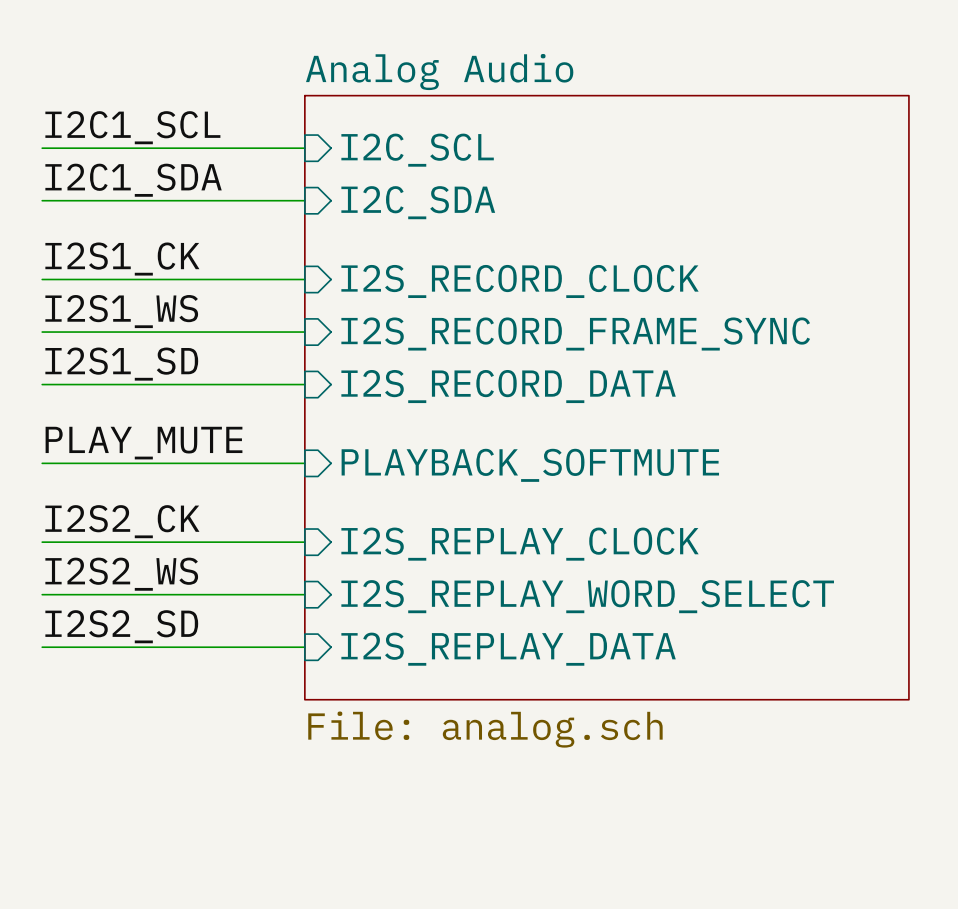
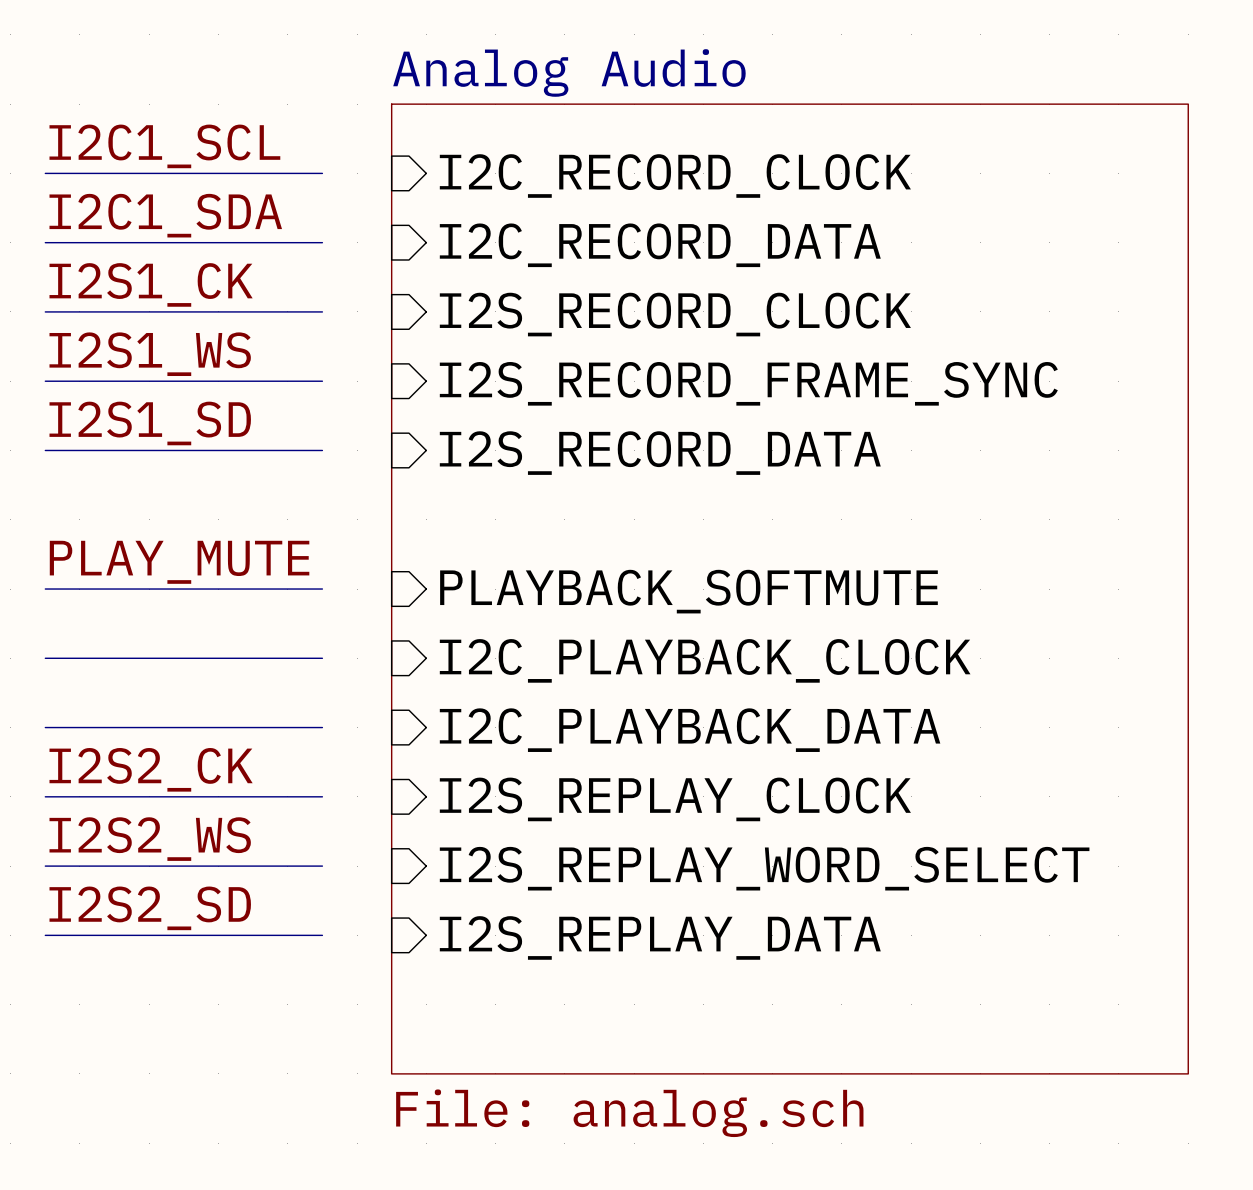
wire: (252, 148) (304, 148) -> none
sheet pin: I2C_SCL (417, 150) -> I2C_RECORD_CLOCK (675, 176)
wire: (252, 200) (304, 200) -> none
sheet pin: I2C_SDA (418, 202) -> I2C_RECORD_DATA (660, 245)
wire: none -> (45, 311) (322, 311)
label position: I2S1_CK (122, 259) -> I2S1_CK (151, 284)
wire: (42, 279) (304, 279) -> none
sheet pin position: I2S_RECORD_CLOCK (520, 281) -> I2S_RECORD_CLOCK (675, 314)
wire: none -> (45, 381) (322, 381)
label position: I2S1_WS (121, 311) -> I2S1_WS (150, 354)
wire: (42, 332) (304, 332) -> none
sheet pin position: I2S_RECORD_FRAME_SYNC (575, 334) -> I2S_RECORD_FRAME_SYNC (748, 383)
wire: none -> (45, 450) (322, 450)
label position: I2S1_SD (121, 364) -> I2S1_SD (150, 423)
wire: (42, 384) (304, 384) -> none
sheet pin position: I2S_RECORD_DATA (508, 386) -> I2S_RECORD_DATA (660, 453)
sheet Analog Audio: File: analog.sch (606, 397) -> none
wire: (252, 463) (304, 463) -> none
sheet Analog Audio: none -> File: analog.sch (789, 589)
wire: none -> (45, 658) (322, 658)
sheet pin: none -> I2C_PLAYBACK_CLOCK (705, 660)
label position: I2S2_CK (122, 521) -> I2S2_CK (151, 769)
wire: (42, 542) (304, 542) -> none
sheet pin position: I2S_REPLAY_CLOCK (520, 544) -> I2S_REPLAY_CLOCK (675, 799)
wire: none -> (45, 727) (322, 727)
sheet pin: none -> I2C_PLAYBACK_DATA (690, 730)
label position: I2S2_WS (121, 574) -> I2S2_WS (150, 839)
wire: (42, 594) (304, 594) -> none
sheet pin position: I2S_REPLAY_WORD_SELECT (587, 596) -> I2S_REPLAY_WORD_SELECT (764, 868)
wire: none -> (45, 796) (322, 796)
label position: I2S2_SD (121, 626) -> I2S2_SD (150, 908)
wire: (42, 647) (304, 647) -> none
sheet pin position: I2S_REPLAY_DATA (508, 649) -> I2S_REPLAY_DATA (660, 937)
wire: none -> (45, 866) (322, 866)
wire: none -> (45, 935) (322, 935)

